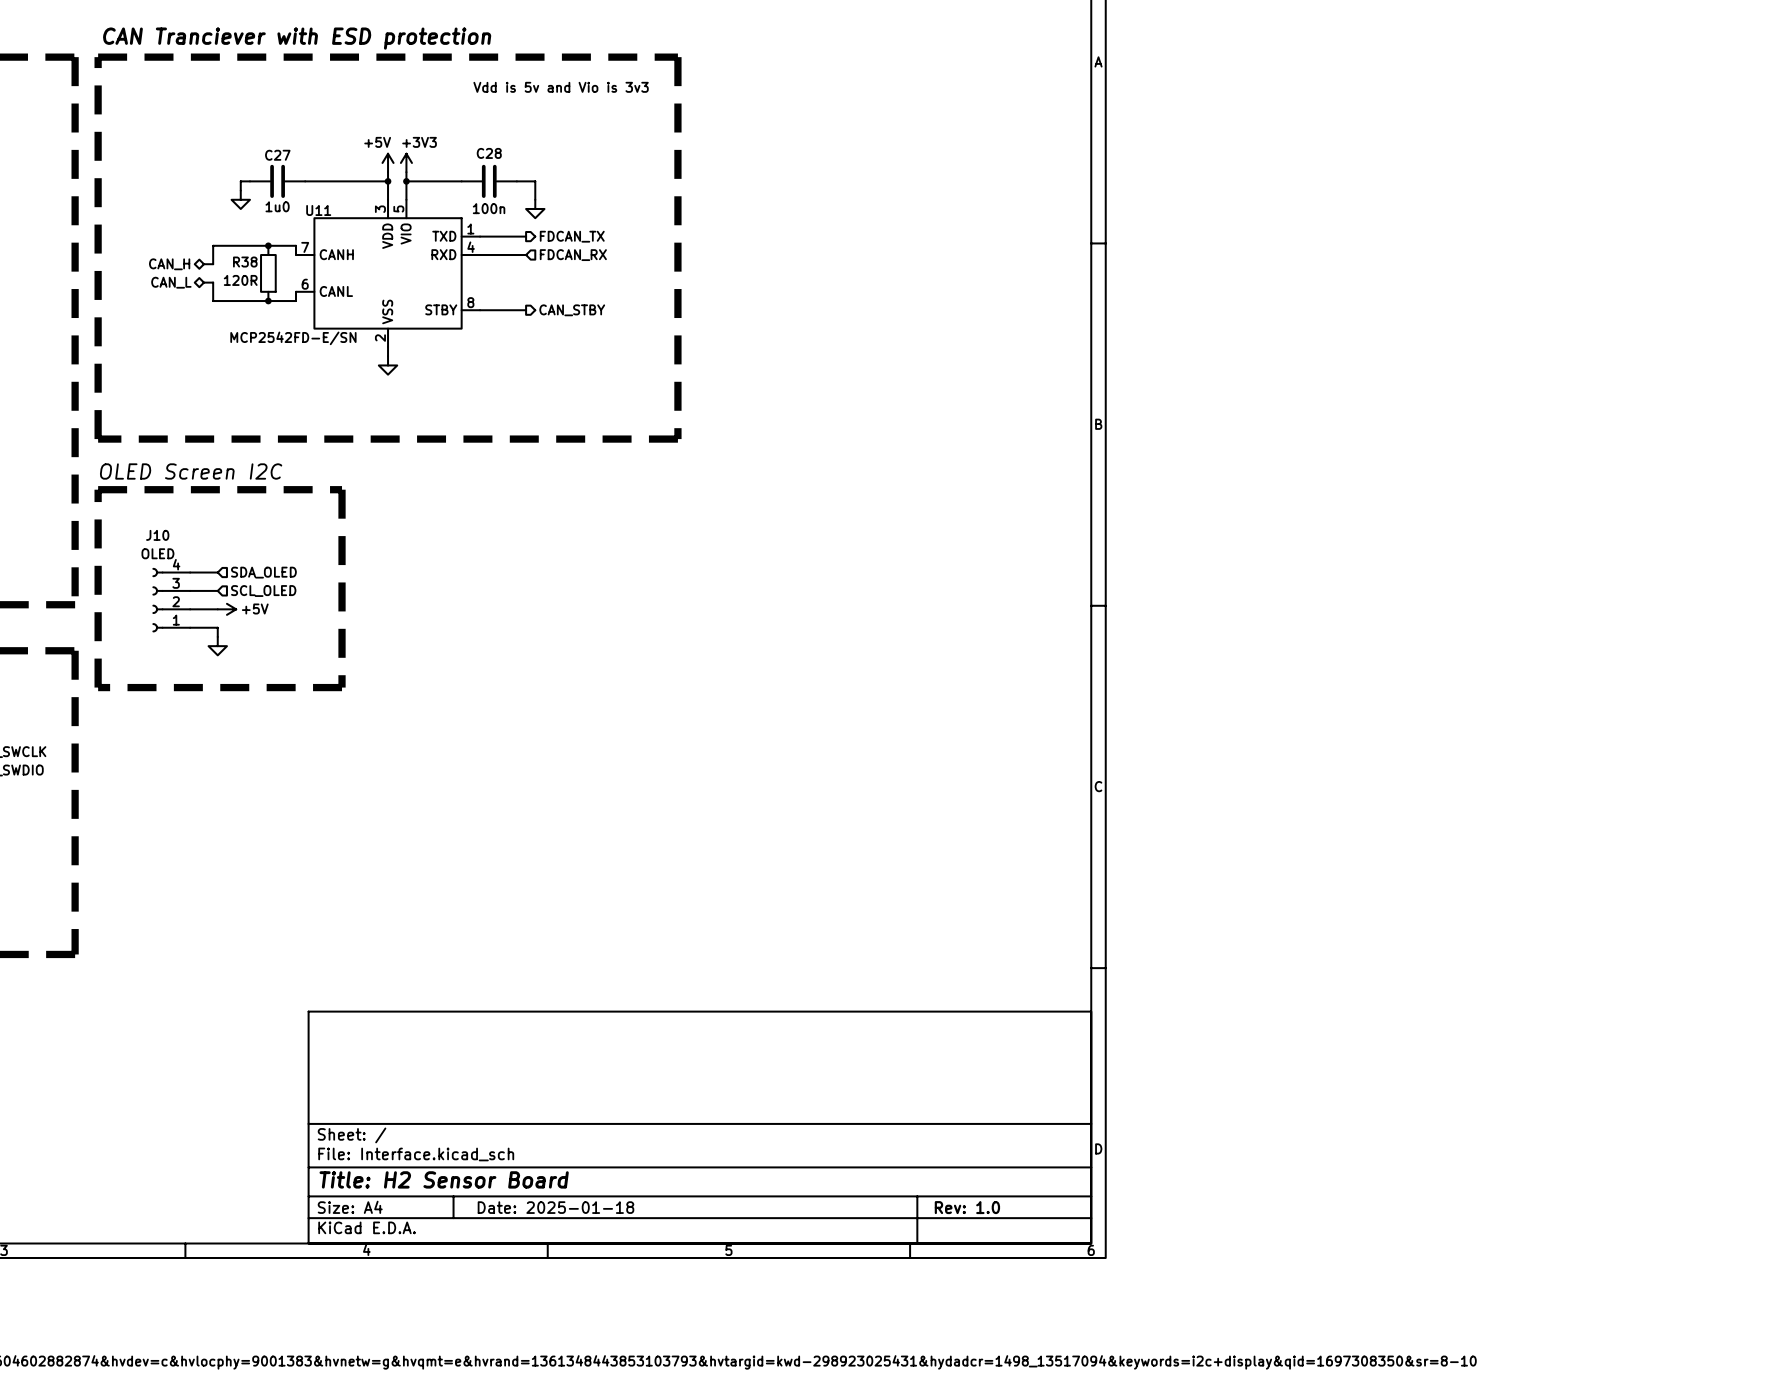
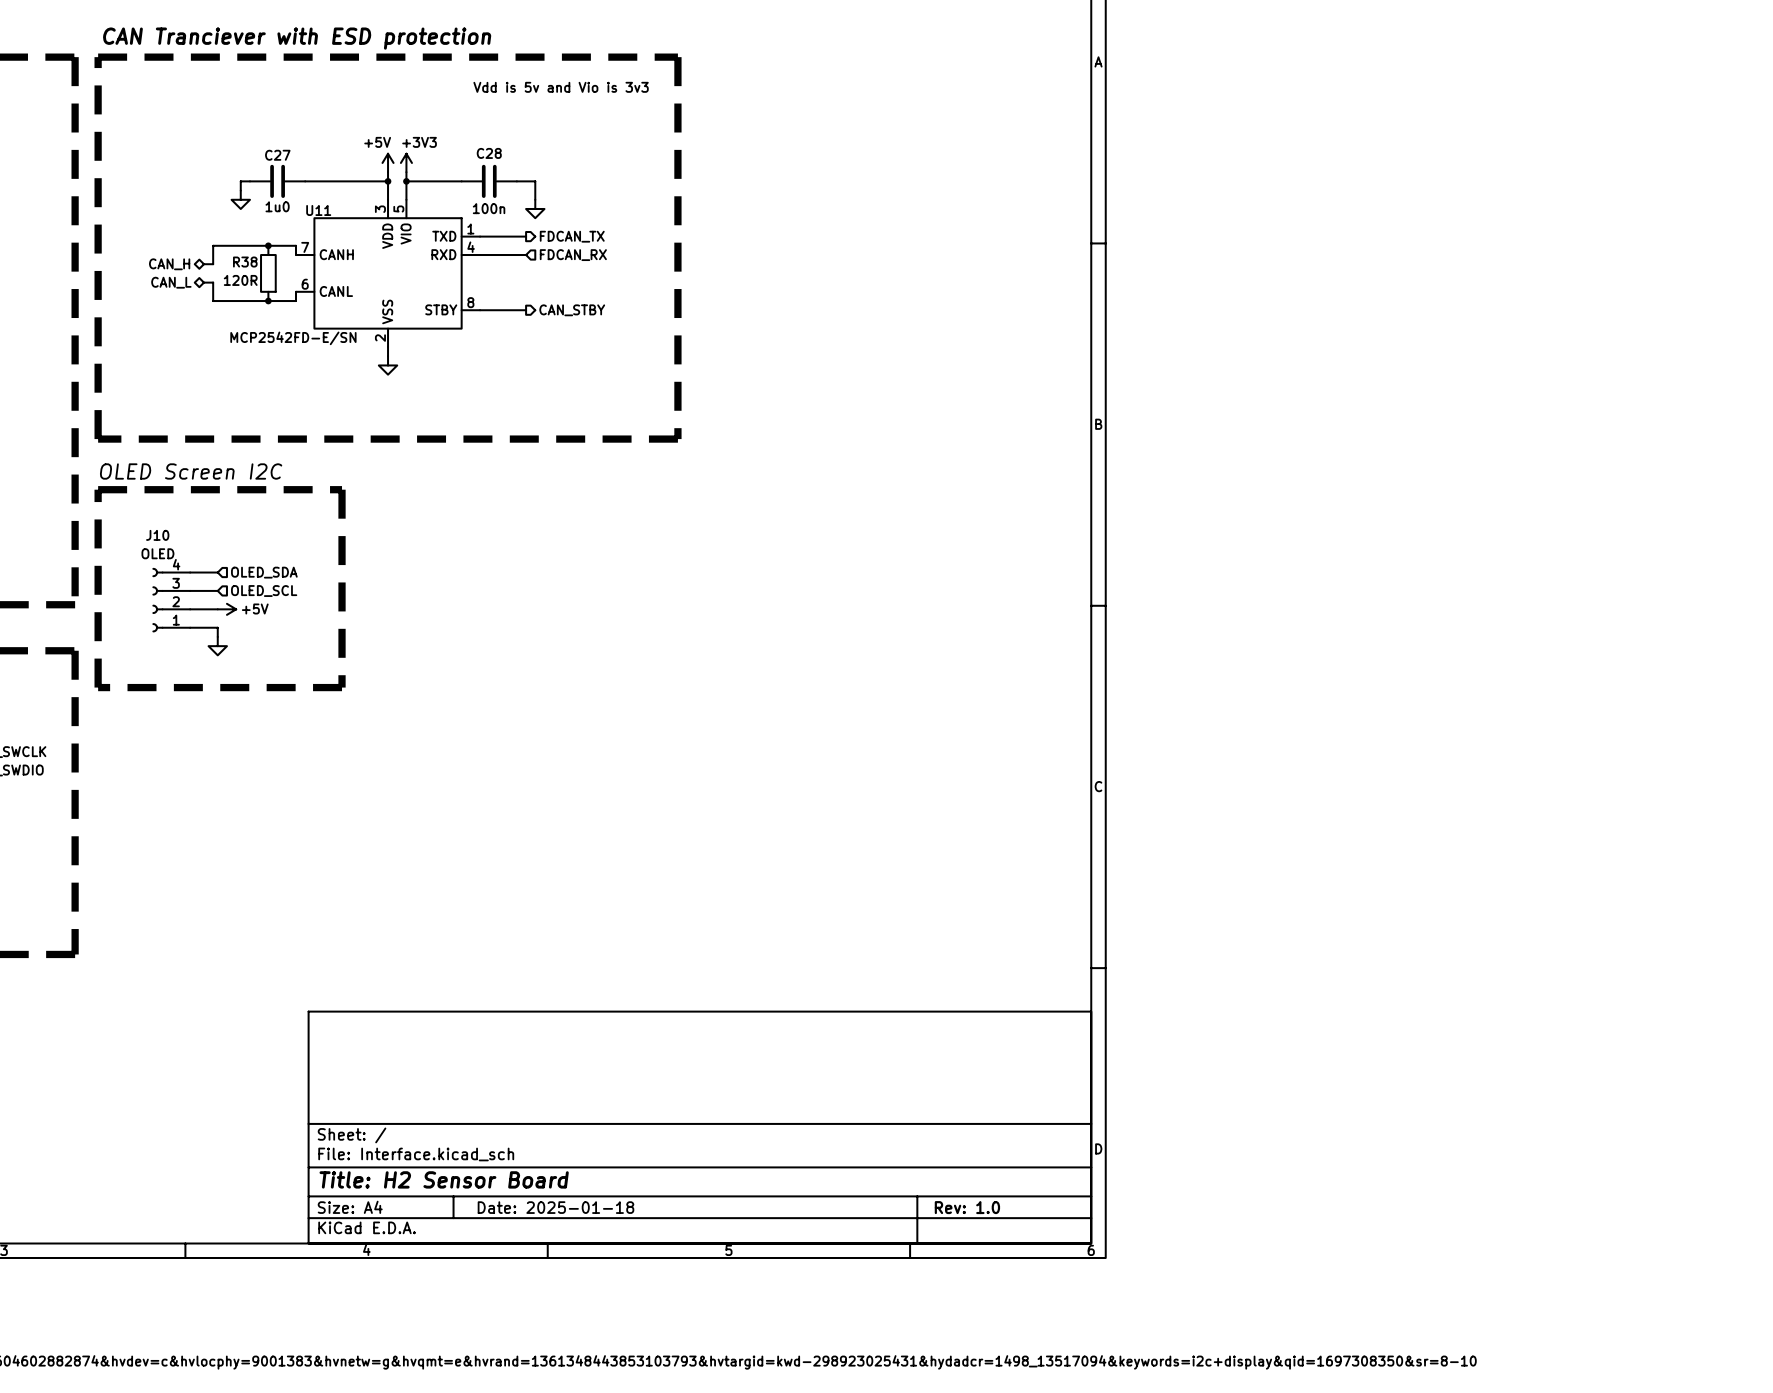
hierarchical label: SDA_OLED (263, 572) -> OLED_SDA (264, 572)
hierarchical label: SCL_OLED (263, 591) -> OLED_SCL (264, 591)

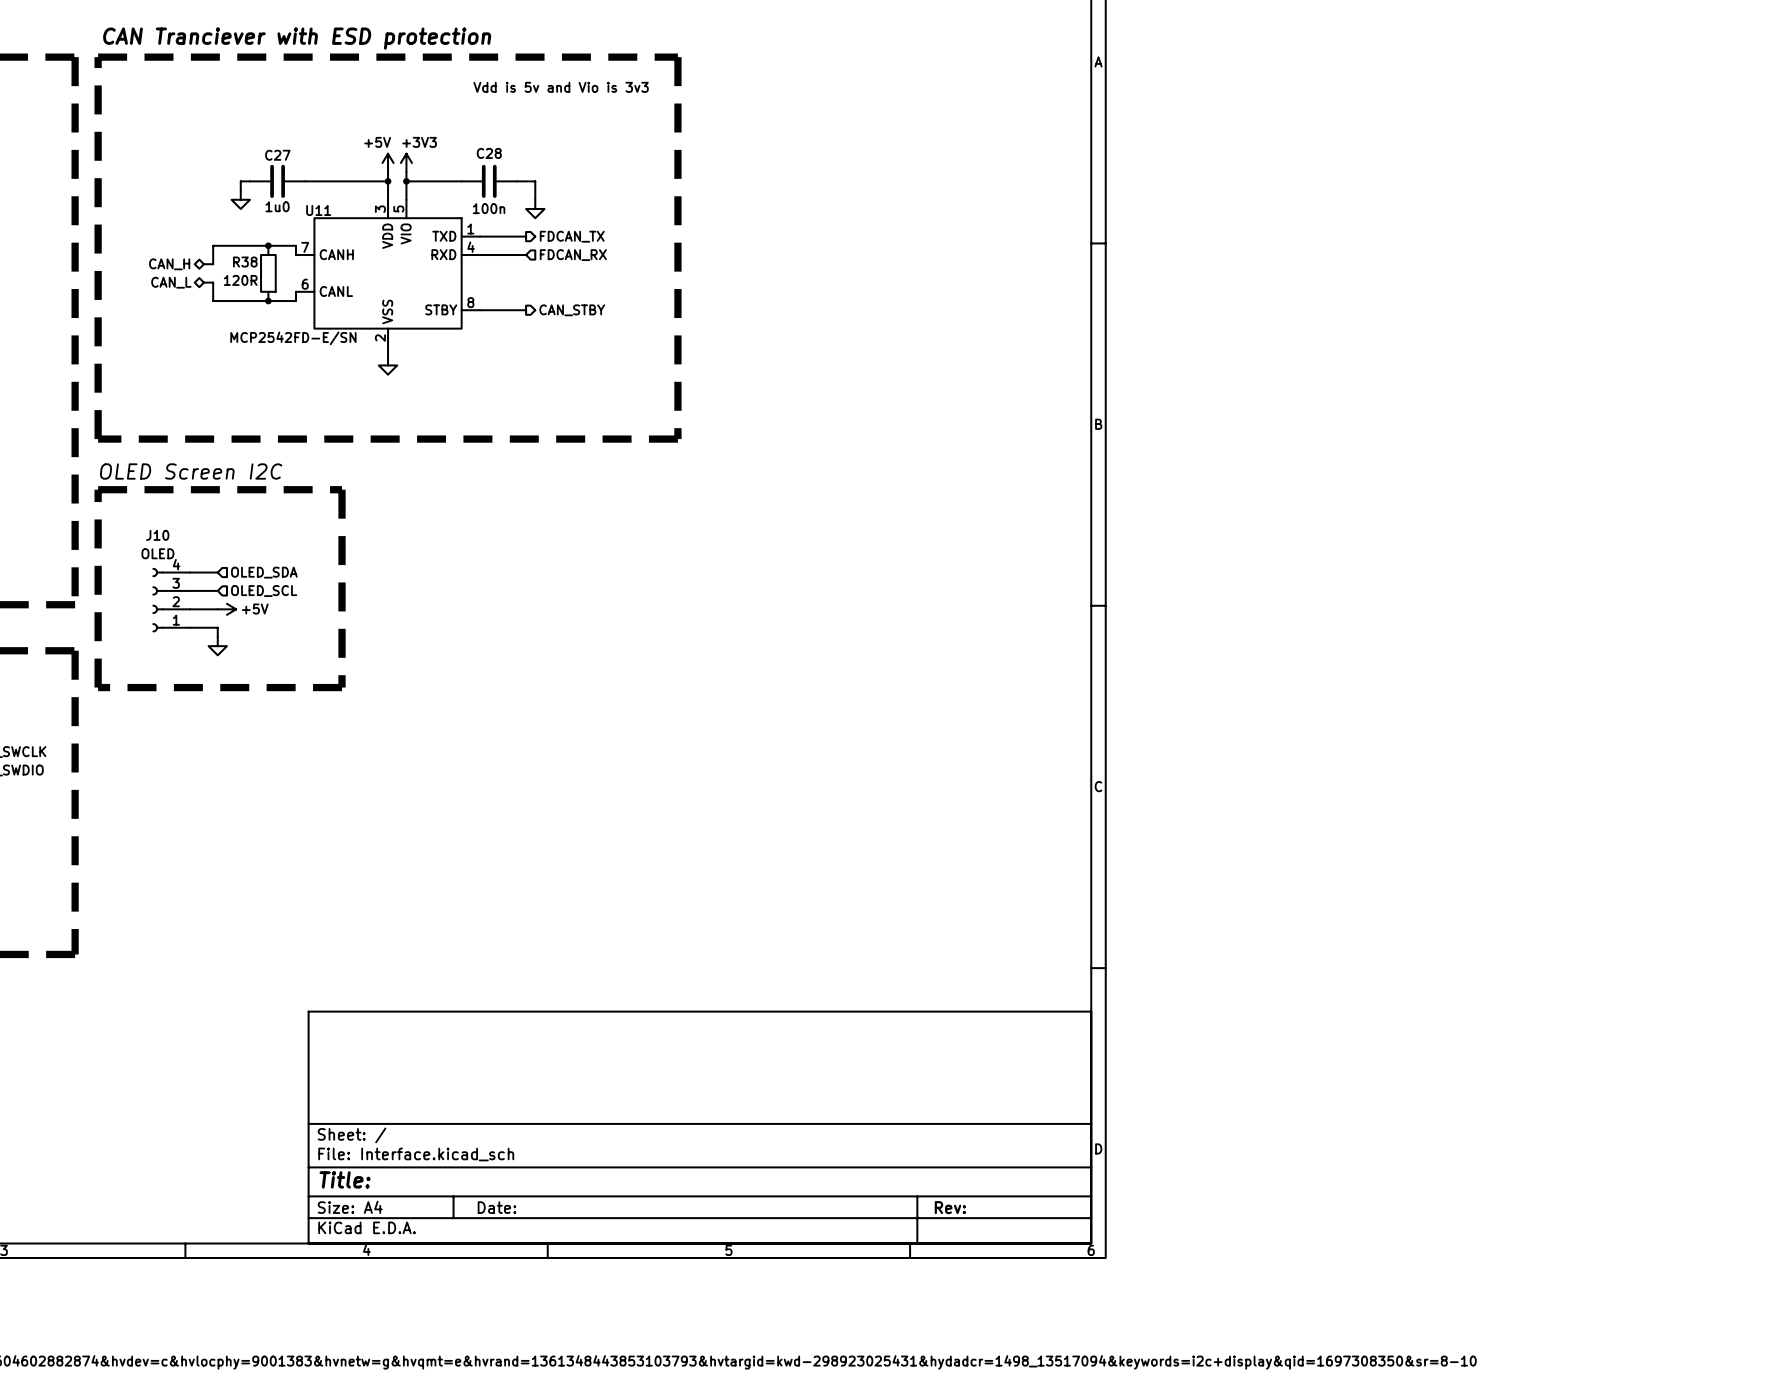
title block: Title: H2 Sensor Board (444, 1179) -> Title: (345, 1179)
title block: Date: 2025-01-18 (555, 1207) -> Date: (496, 1207)
title block: Rev: 1.0 (967, 1207) -> Rev: (950, 1207)

